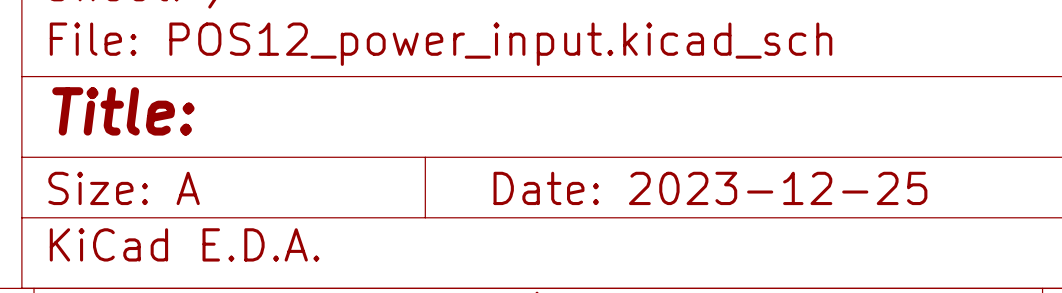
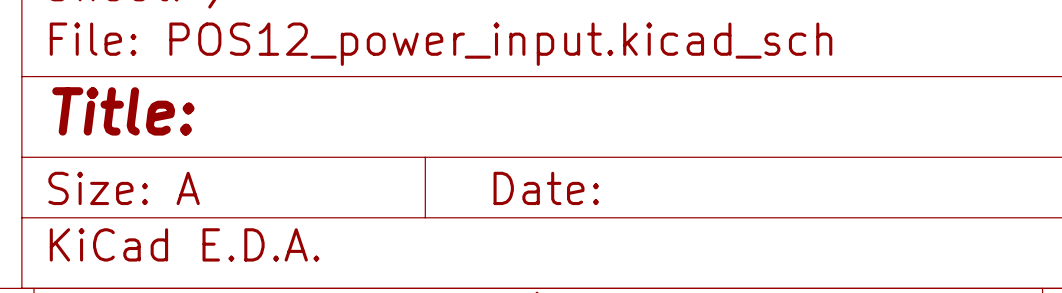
title block: Date: 2023-12-25 (710, 188) -> Date: (546, 188)

